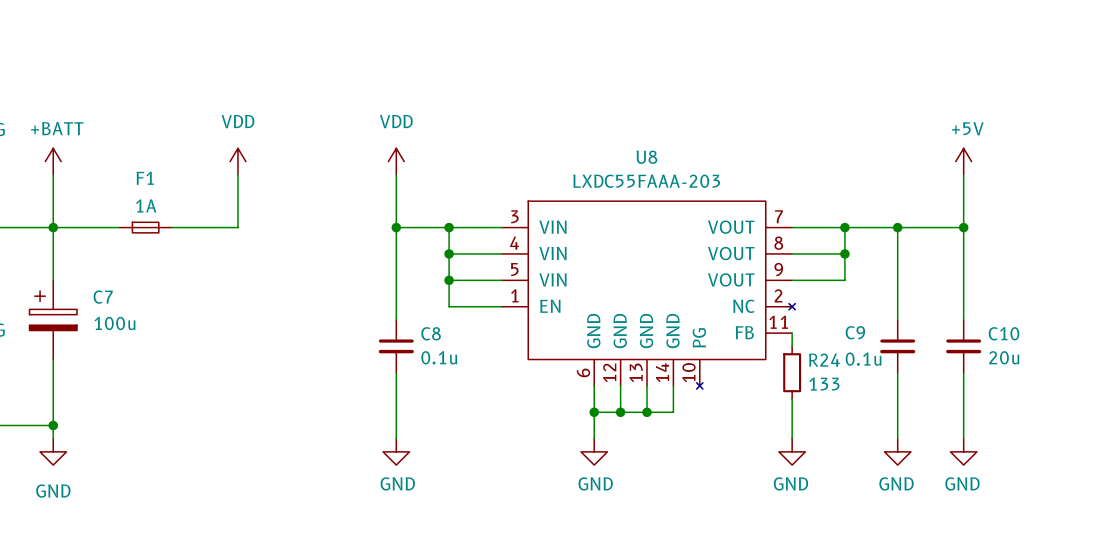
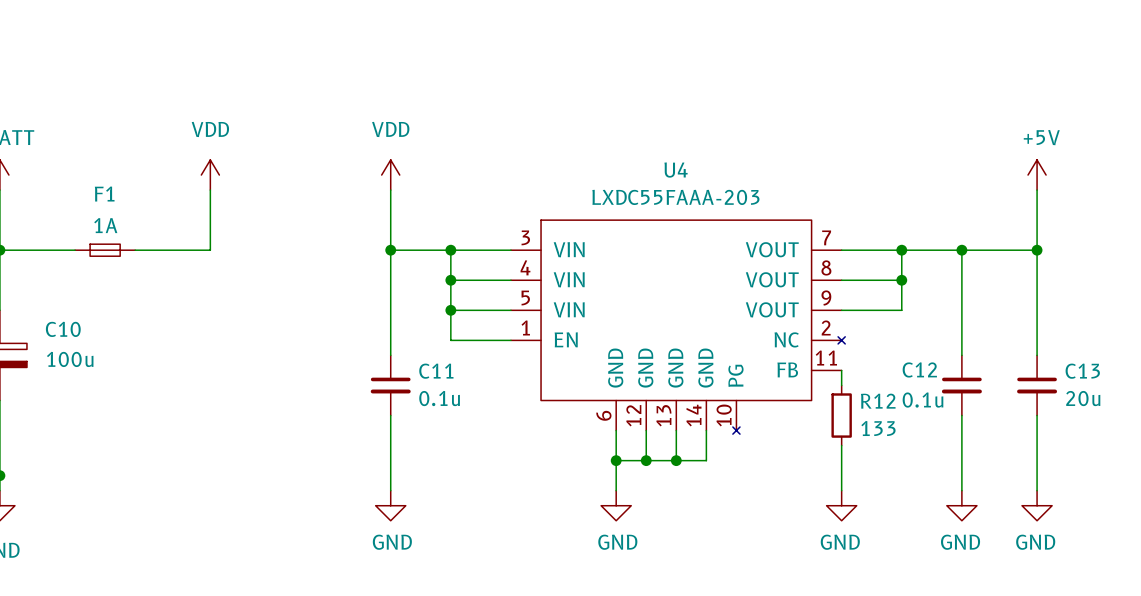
U8 name: U8 (646, 157) -> U4 (676, 170)
C7 name: C7 (103, 297) -> C10 (63, 329)
C9 name: C9 (855, 332) -> C12 (919, 369)
C8 name: C8 (431, 333) -> C11 (436, 371)
C10 name: C10 (1004, 333) -> C13 (1082, 371)
R24 name: R24 (824, 360) -> R12 (878, 401)

